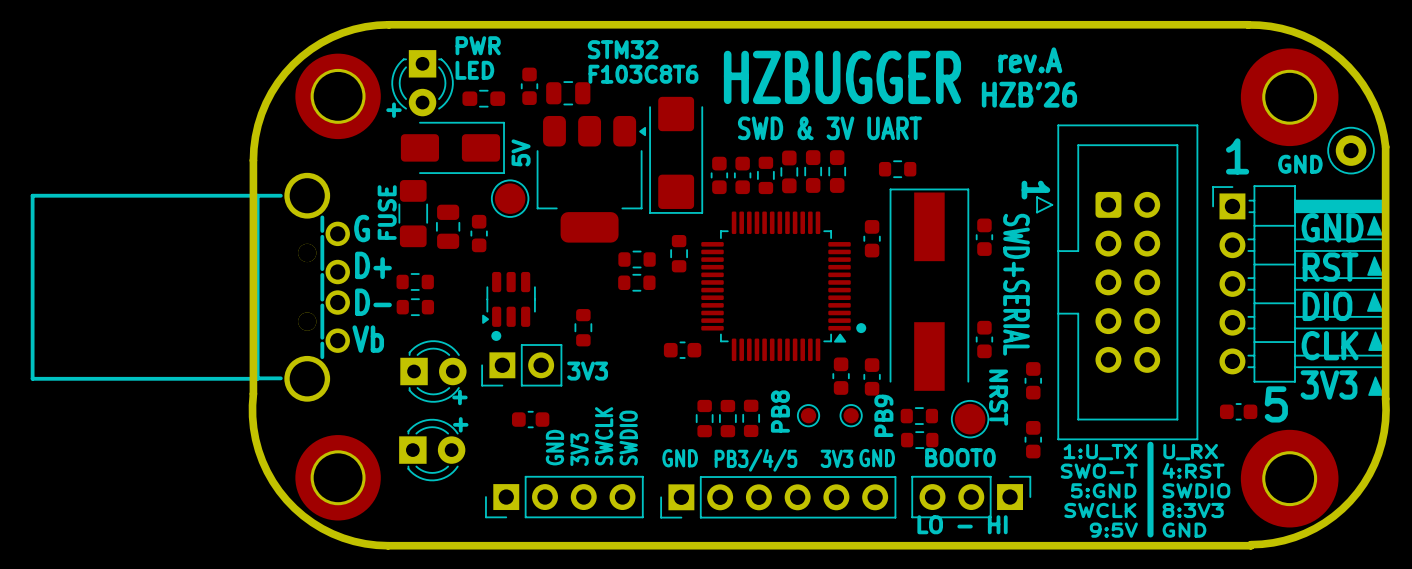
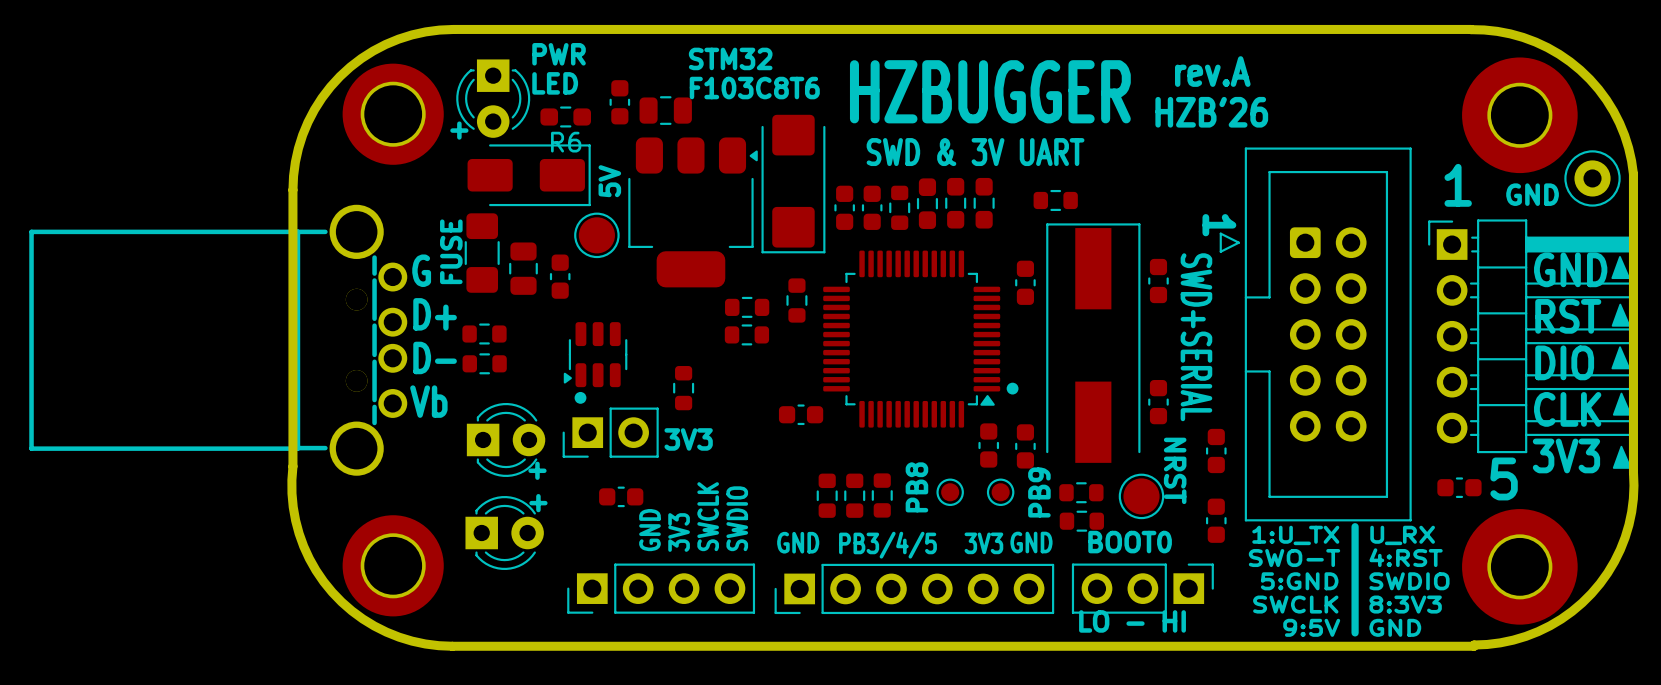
R6 name: none -> R6 (566, 142)

